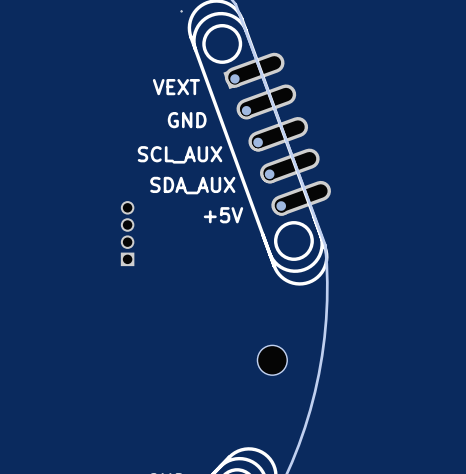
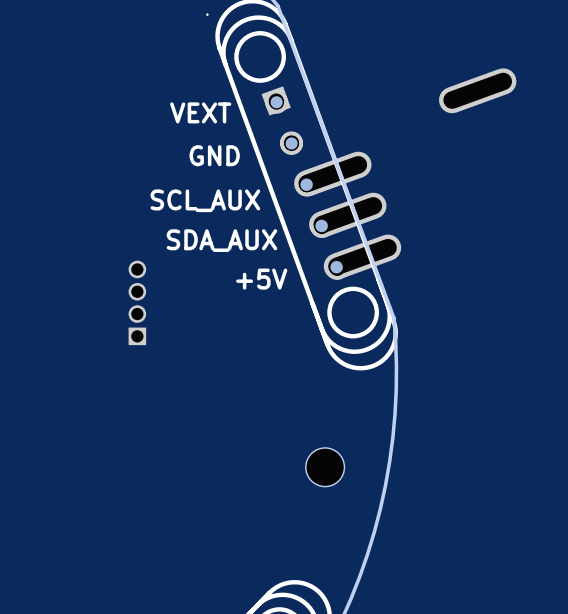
part: (254, 70) -> none
part: none -> (477, 90)
part: (266, 101) -> none

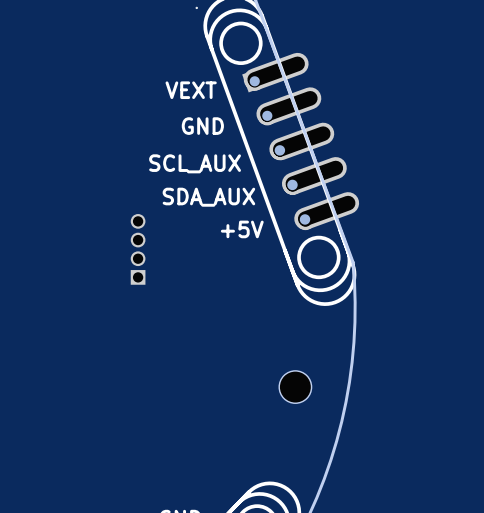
part: none -> (276, 71)
part: (477, 90) -> none
part: none -> (288, 106)

